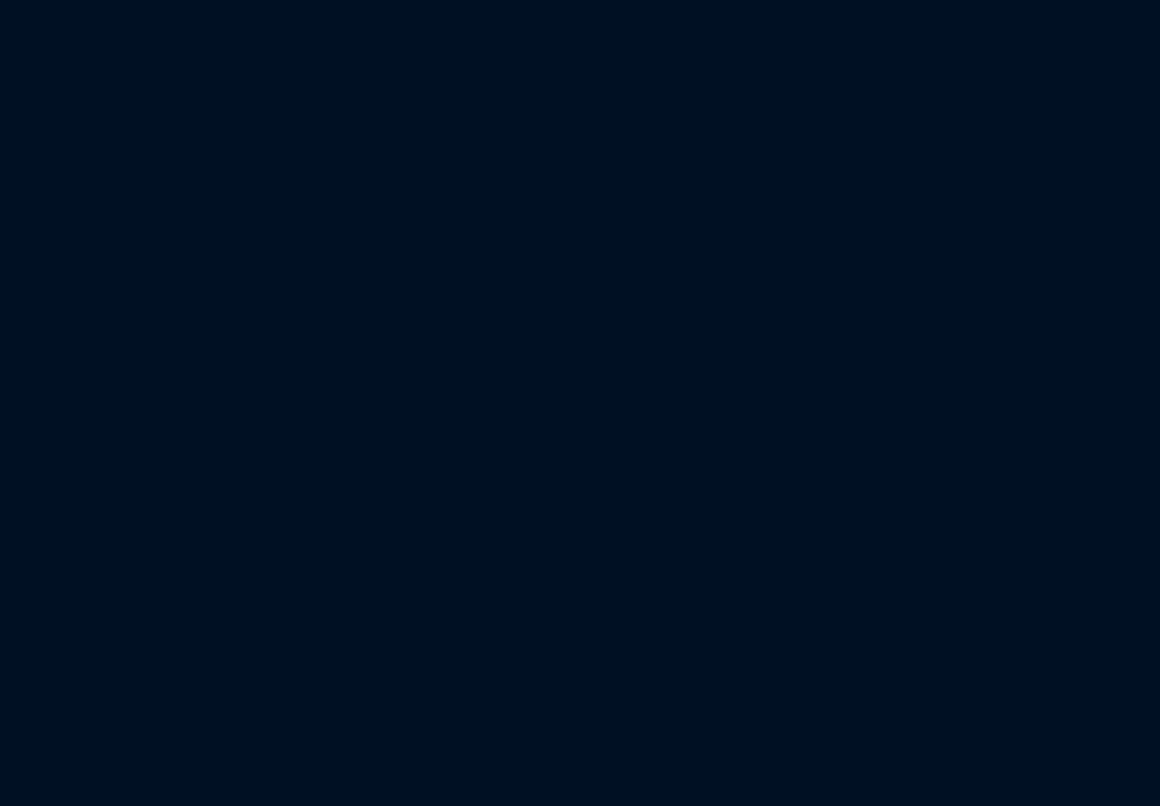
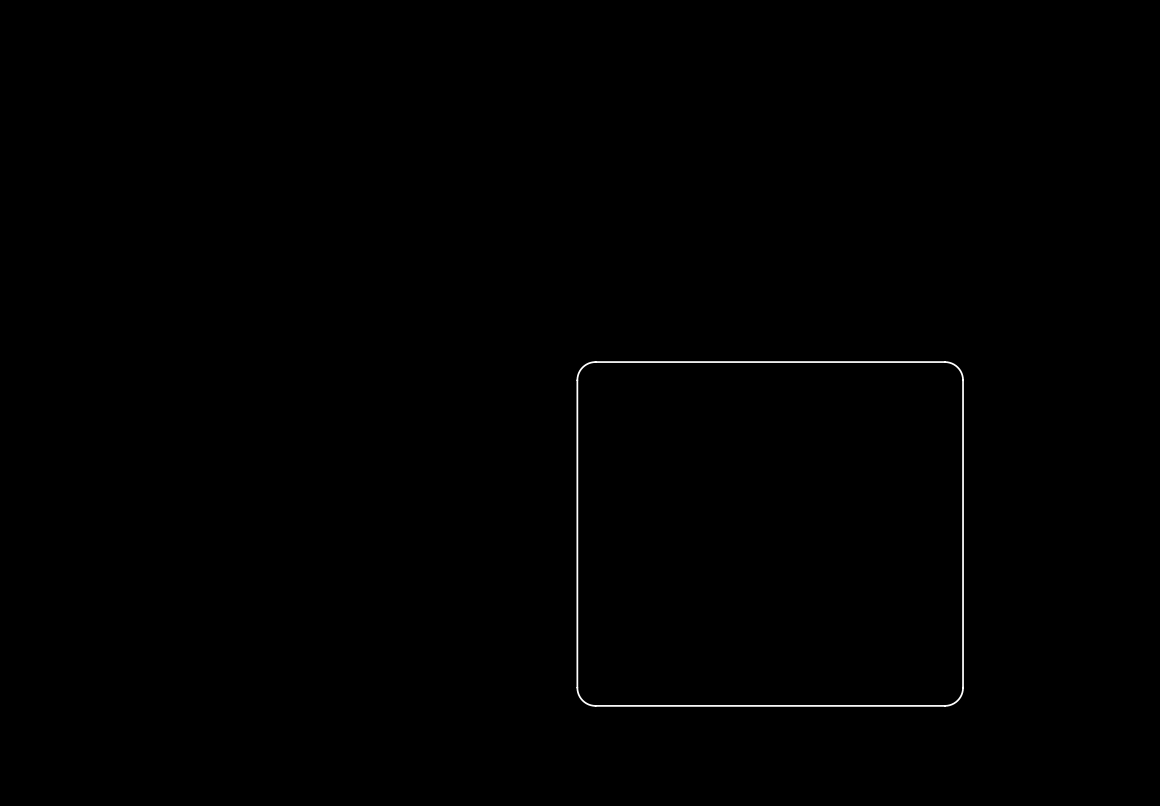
board edge: none -> (944, 362) (595, 362) (582, 367) (577, 380) (577, 687) (582, 700) (595, 705) (944, 705) (957, 700) (963, 687) (963, 380) (957, 367) (944, 362)

